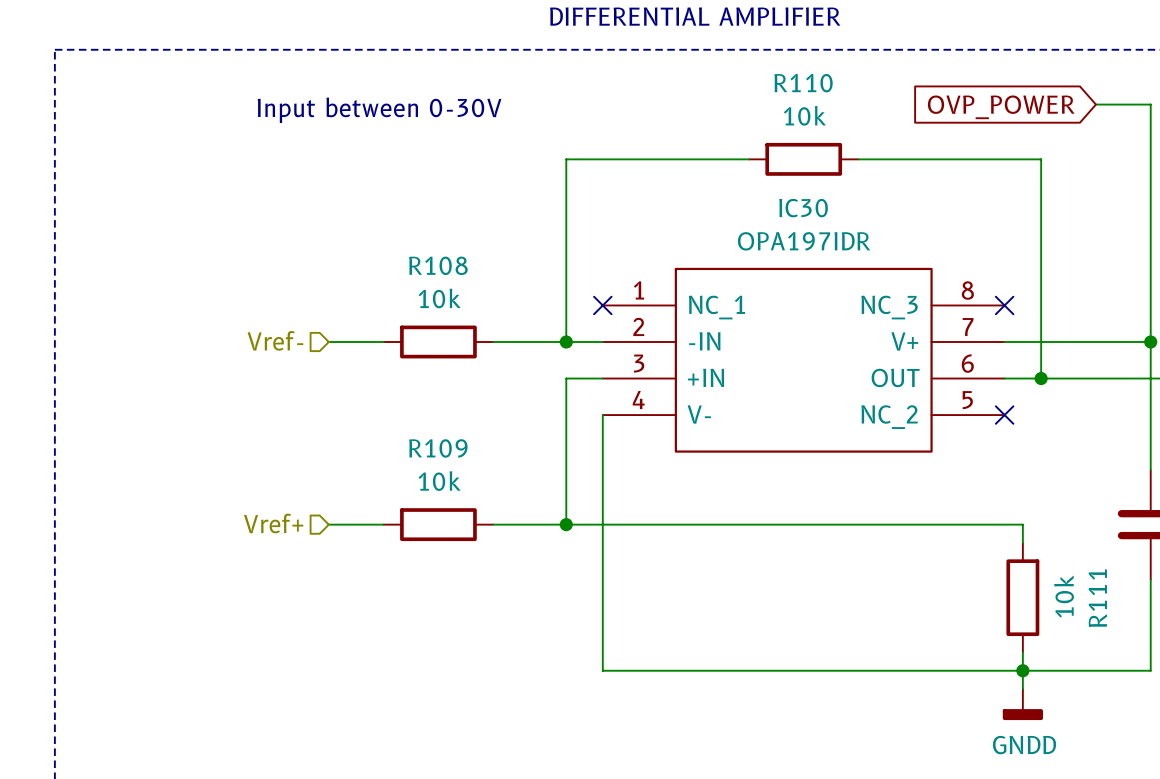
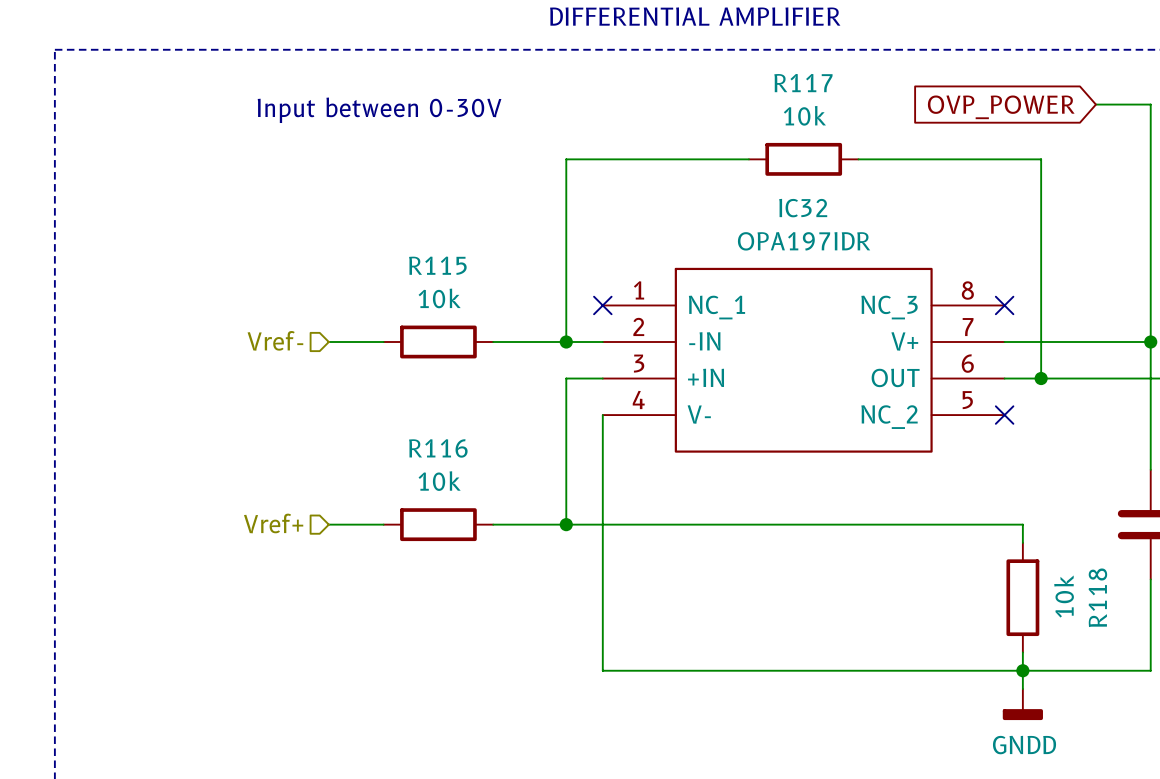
R110 name: R110 (803, 83) -> R117 (803, 83)
IC30 name: IC30 (803, 208) -> IC32 (803, 208)
R108 name: R108 (438, 265) -> R115 (437, 265)
R109 name: R109 (438, 448) -> R116 (438, 448)
R111 name: R111 (1097, 598) -> R118 (1097, 597)

